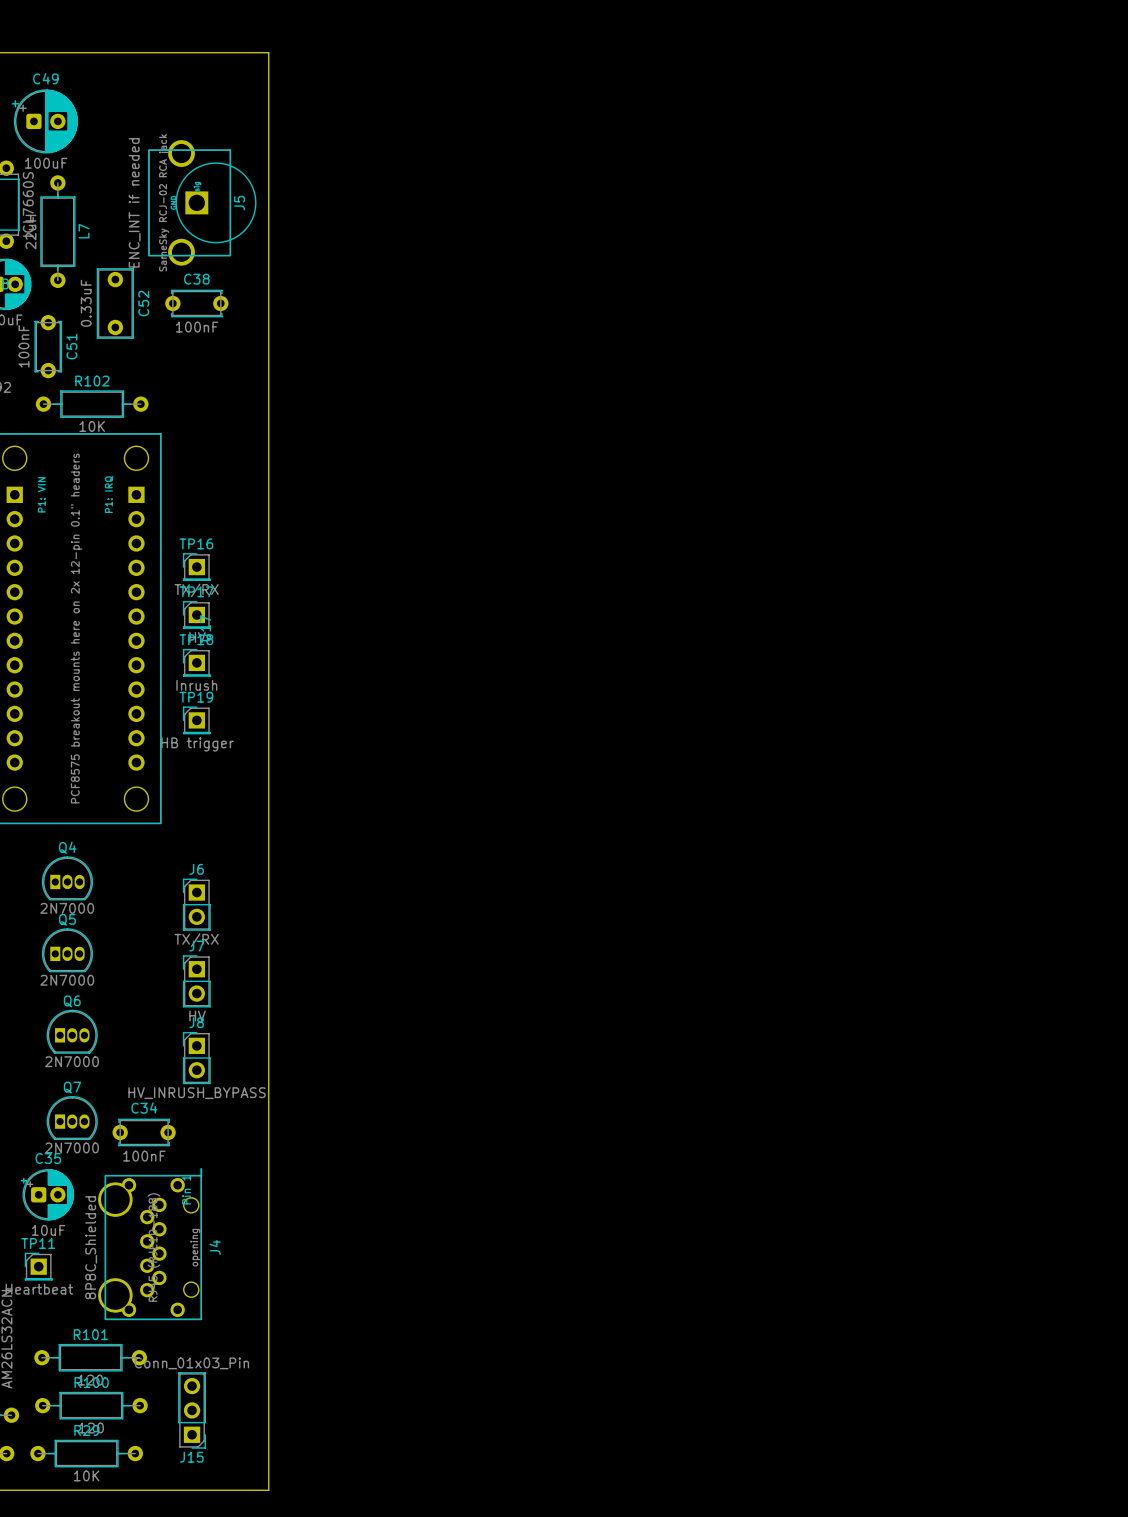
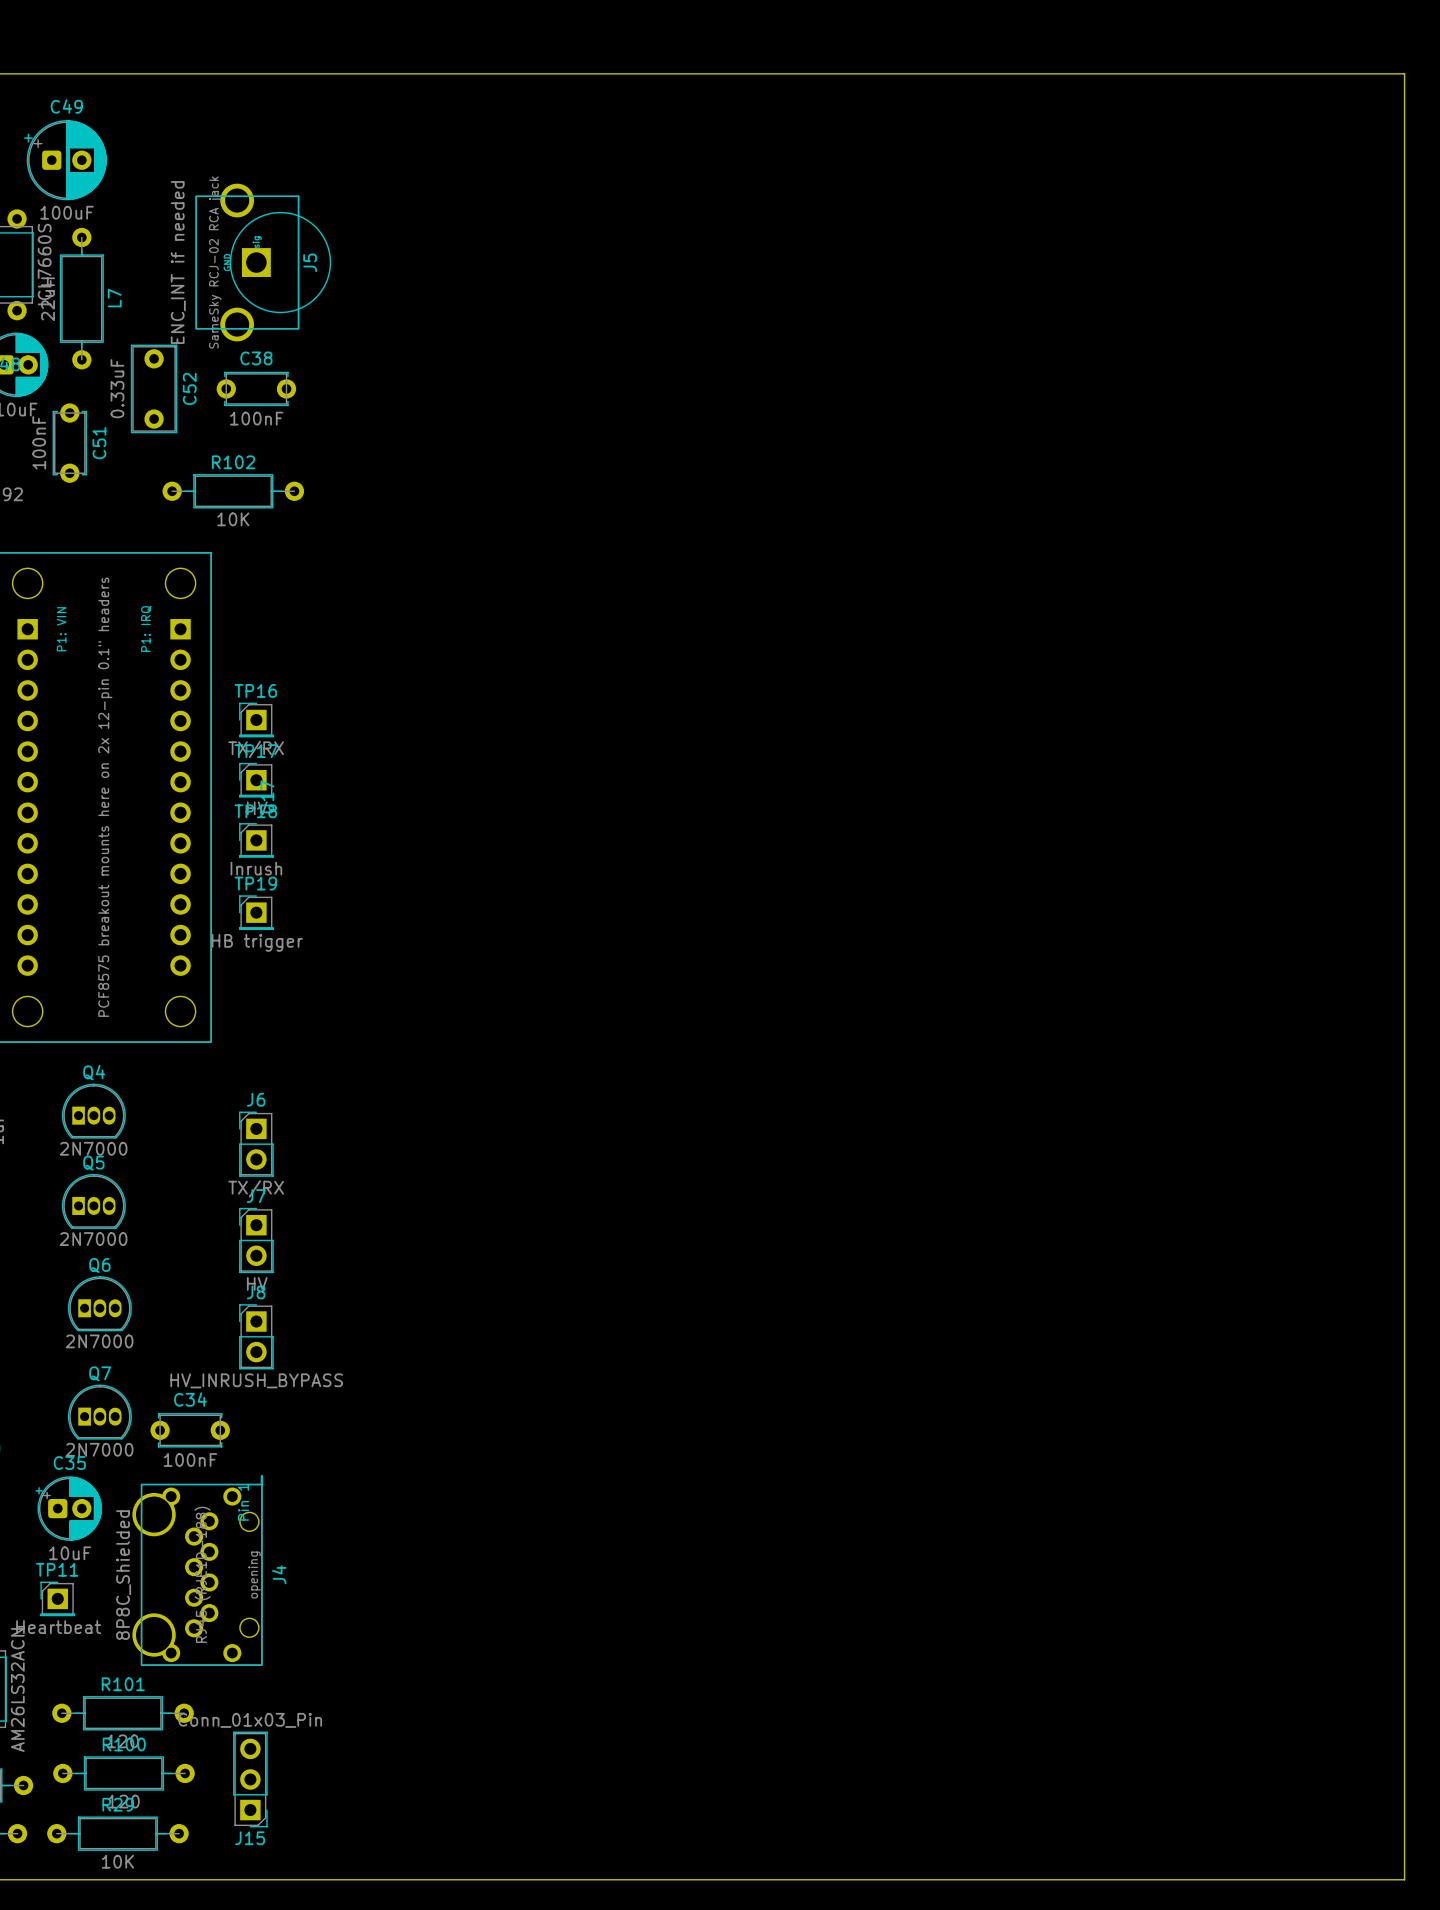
board edge: (268, 52) (268, 1490) -> (346, 73) (1404, 73) (1404, 1879) (346, 1879)
R102 position: (92, 404) -> (233, 491)

